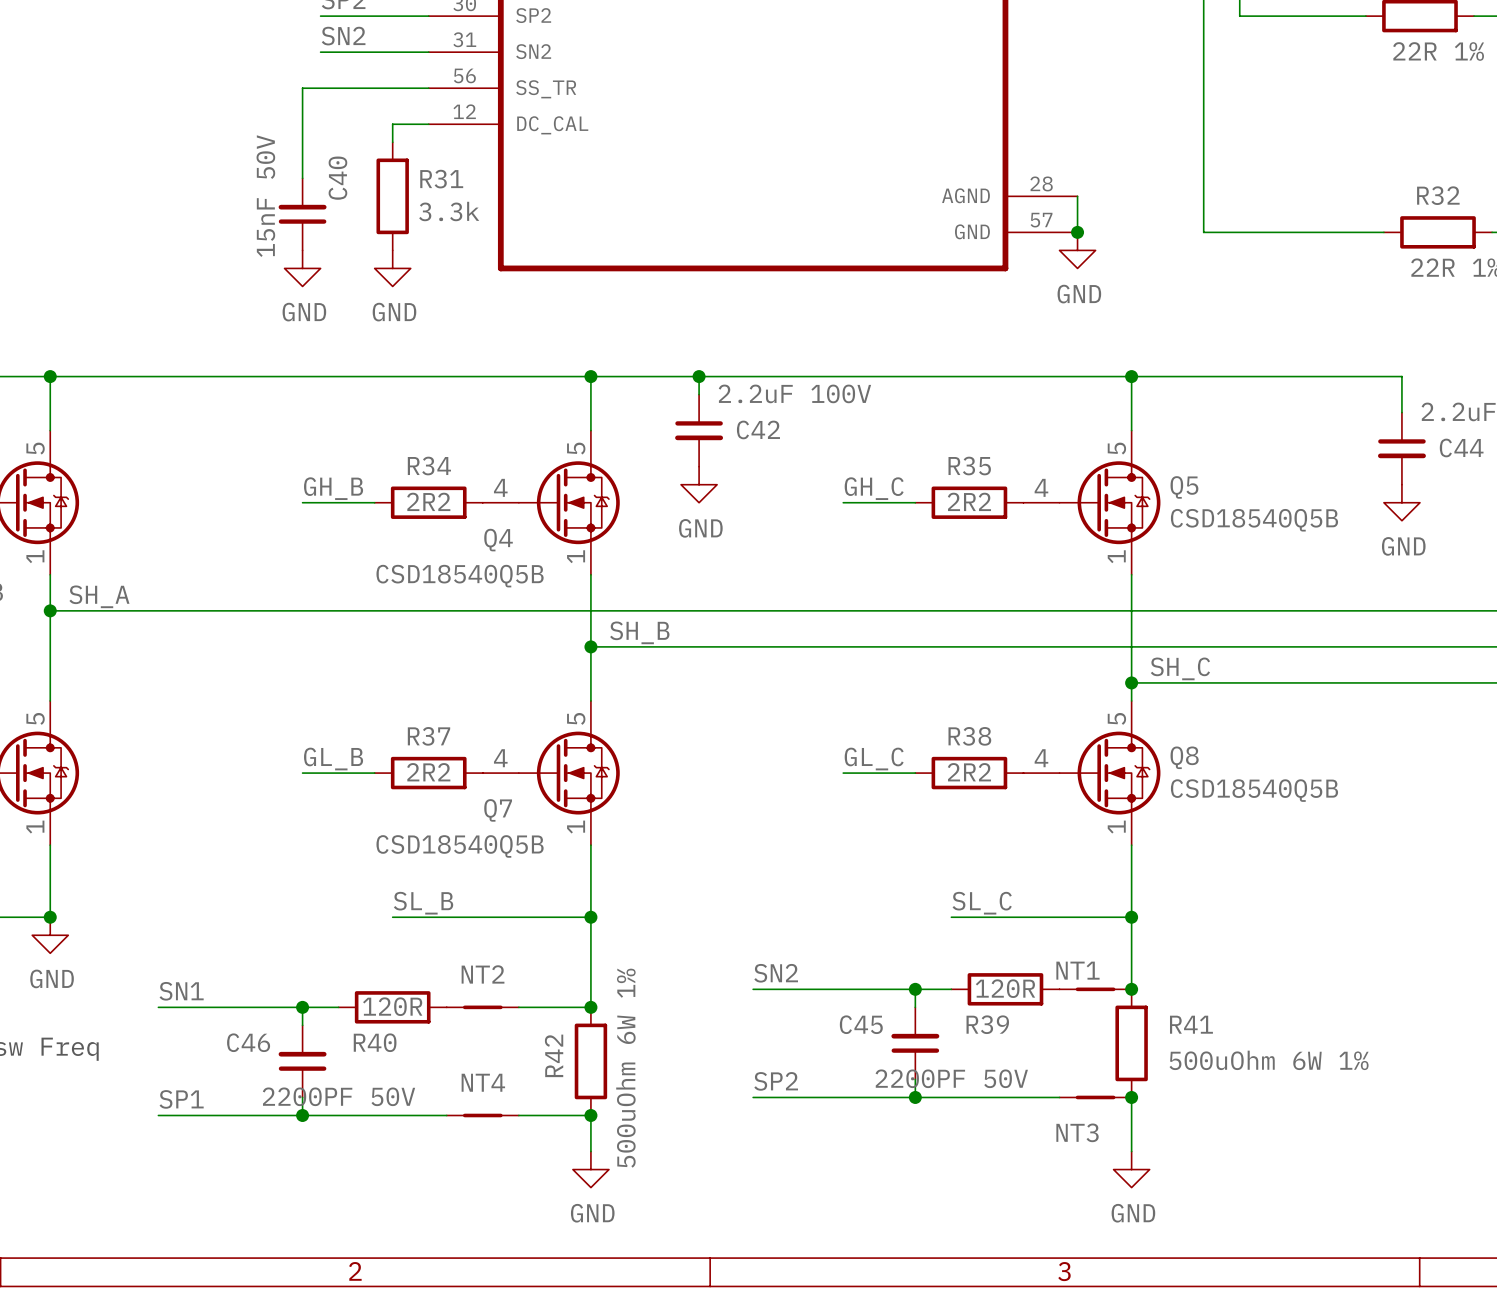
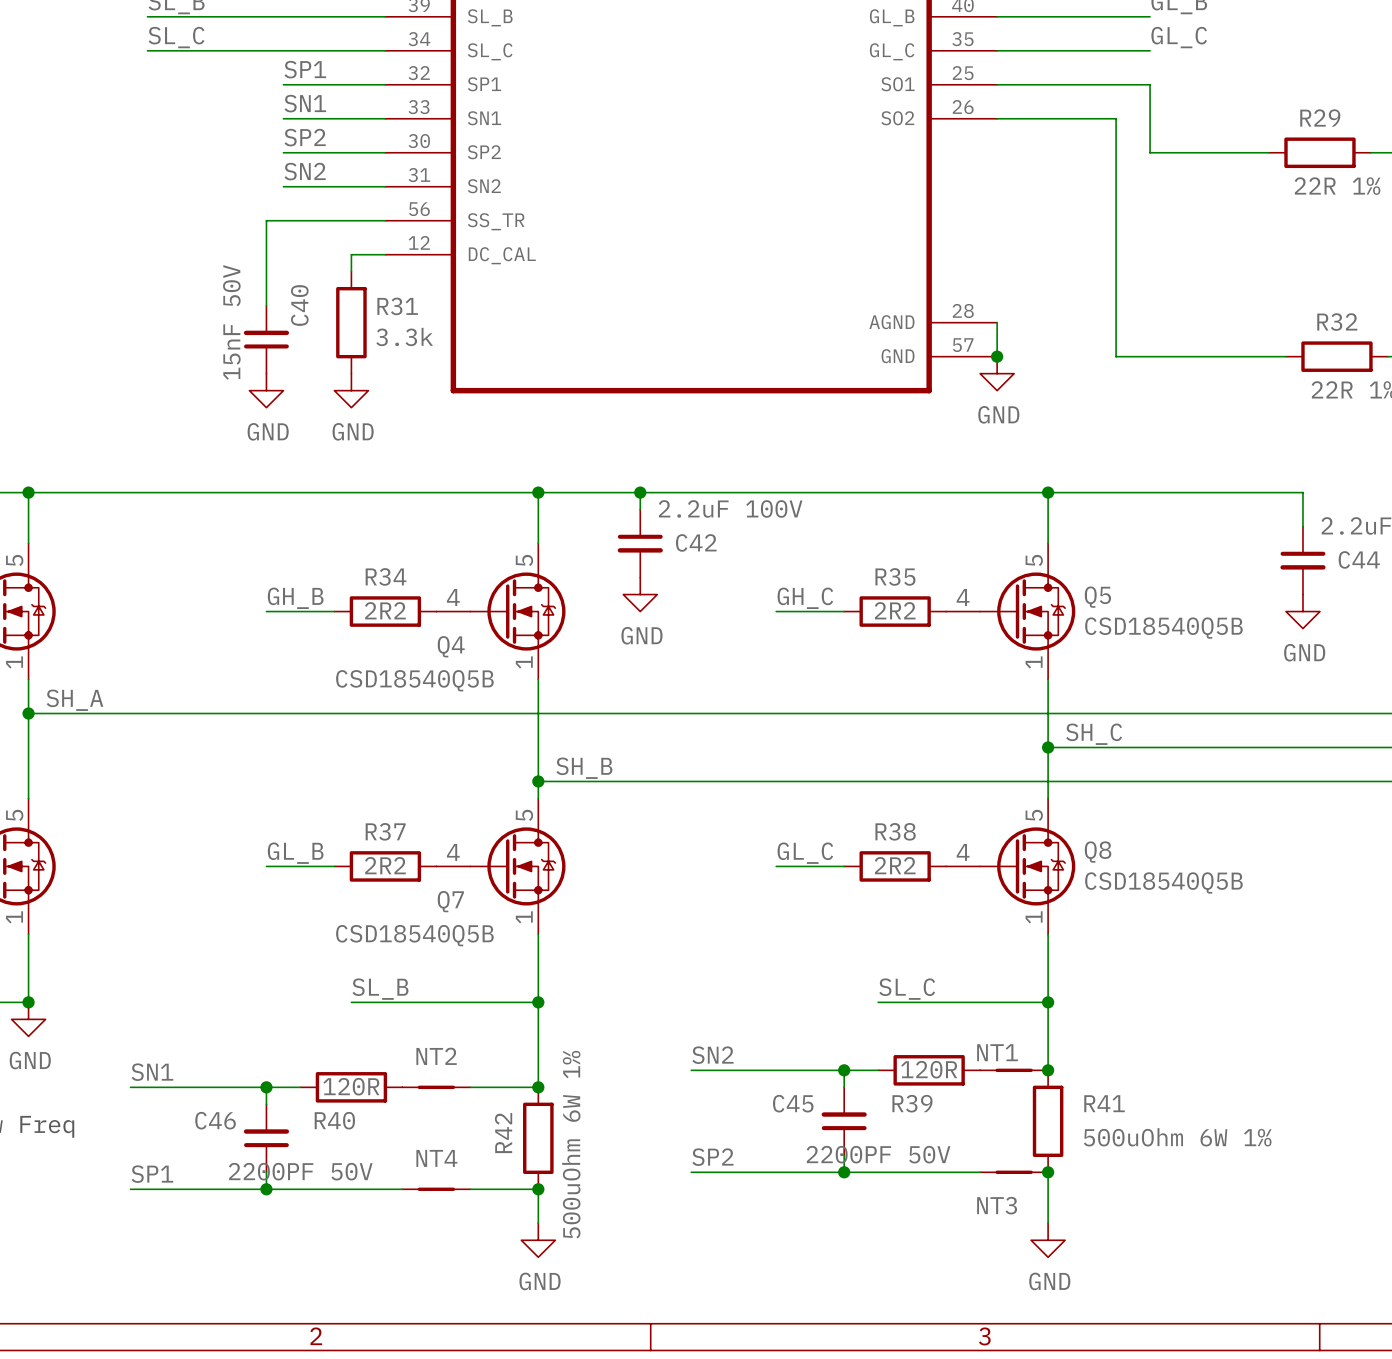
label position: SH_B (639, 632) -> SH_B (584, 768)
wire: (590, 646) (1131, 646) -> (538, 781) (1048, 781)
junction position: (590, 646) -> (538, 781)
label position: SH_C (1180, 668) -> SH_C (1094, 734)
junction position: (1131, 682) -> (1048, 747)

